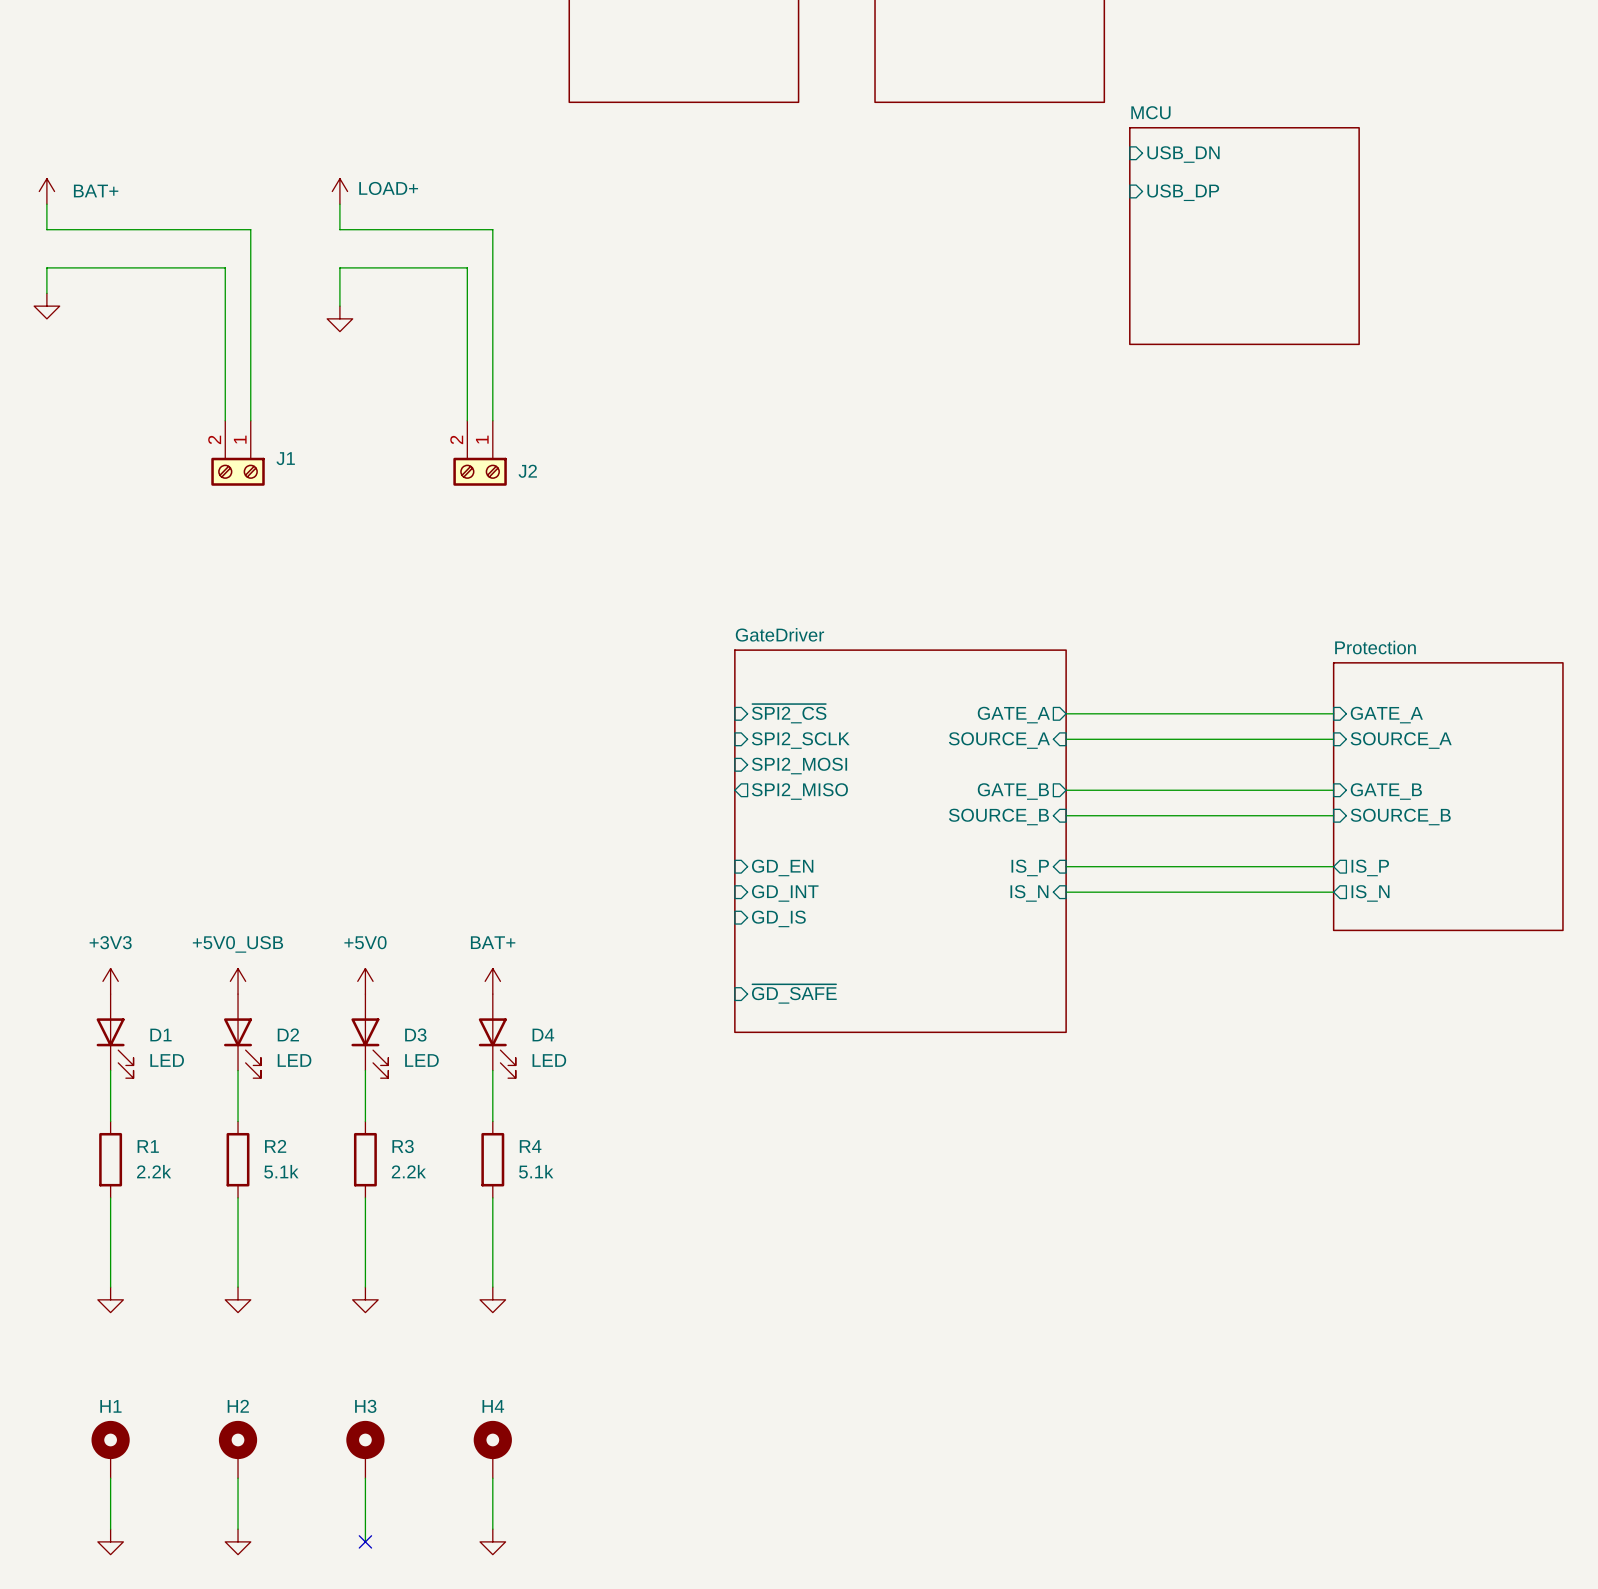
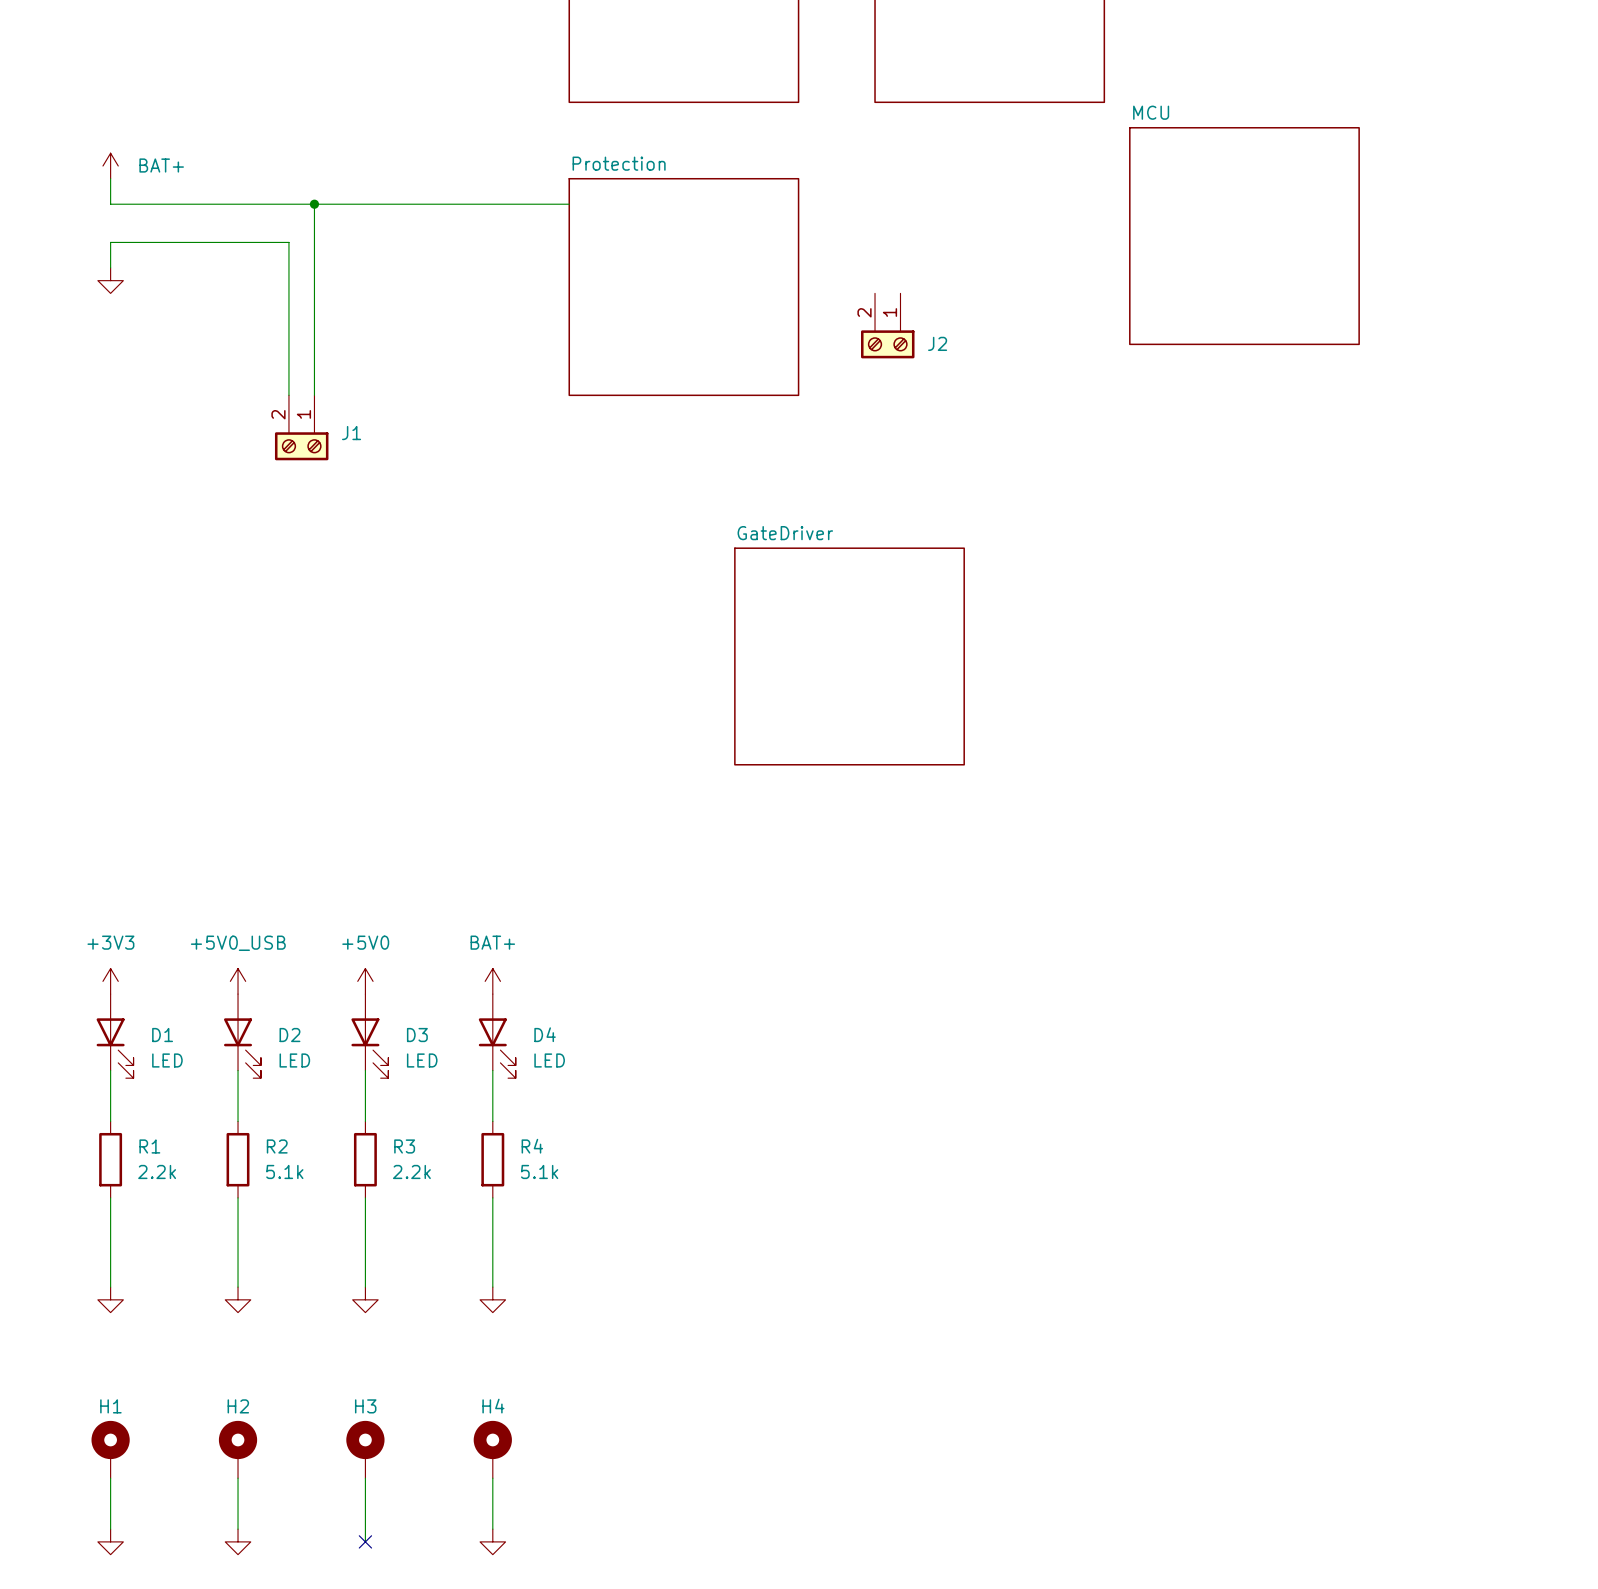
sheet pin: USB_DN (1183, 154) -> none
wire: none -> (110, 178) (110, 204) (569, 204)
power symbol position: BAT+ (46, 191) -> BAT+ (110, 165)
power symbol: LOAD+ (339, 191) -> none
sheet pin: USB_DP (1183, 192) -> none
wire: (46, 204) (46, 229) (250, 229) (250, 420) -> none
wire: none -> (314, 204) (314, 395)
junction: none -> (314, 204)
wire: (339, 204) (339, 229) (492, 229) (492, 420) -> none
sheet Protection: none -> (683, 287)
wire: (46, 293) (46, 267) (225, 267) (225, 420) -> (110, 267) (110, 242) (288, 242) (288, 395)
power symbol position: (46, 306) -> (110, 280)
wire: (339, 306) (339, 267) (467, 267) (467, 420) -> none
power symbol: (339, 318) -> none
J1 position: (238, 453) -> (301, 427)
J2 position: (480, 453) -> (887, 325)
sheet GateDriver: none -> (849, 656)
sheet pin: ~{SPI2_CS} (789, 713) -> none
wire: (1066, 713) (1333, 713) -> none
sheet pin: GATE_A (1013, 715) -> none
sheet pin: GATE_A (1386, 715) -> none
wire: (1066, 739) (1333, 739) -> none
sheet pin: SPI2_SCLK (800, 740) -> none
sheet pin: SOURCE_A (999, 740) -> none
sheet pin: SOURCE_A (1401, 740) -> none
sheet pin: SPI2_MOSI (799, 766) -> none
wire: (1066, 790) (1333, 790) -> none
sheet pin: SPI2_MISO (799, 791) -> none
sheet pin: GATE_B (1013, 791) -> none
sheet pin: GATE_B (1386, 791) -> none
sheet Protection: (1448, 796) -> none
wire: (1066, 815) (1333, 815) -> none
sheet pin: SOURCE_B (998, 817) -> none
sheet pin: SOURCE_B (1400, 817) -> none
sheet GateDriver: (900, 841) -> none
wire: (1066, 866) (1333, 866) -> none
sheet pin: GD_EN (782, 867) -> none
sheet pin: IS_P (1030, 867) -> none
sheet pin: IS_P (1370, 867) -> none
wire: (1066, 892) (1333, 892) -> none
sheet pin: GD_INT (785, 893) -> none
sheet pin: IS_N (1029, 893) -> none
sheet pin: IS_N (1370, 893) -> none
sheet pin: GD_IS (778, 918) -> none
sheet pin: ~{GD_SAFE} (794, 993) -> none

